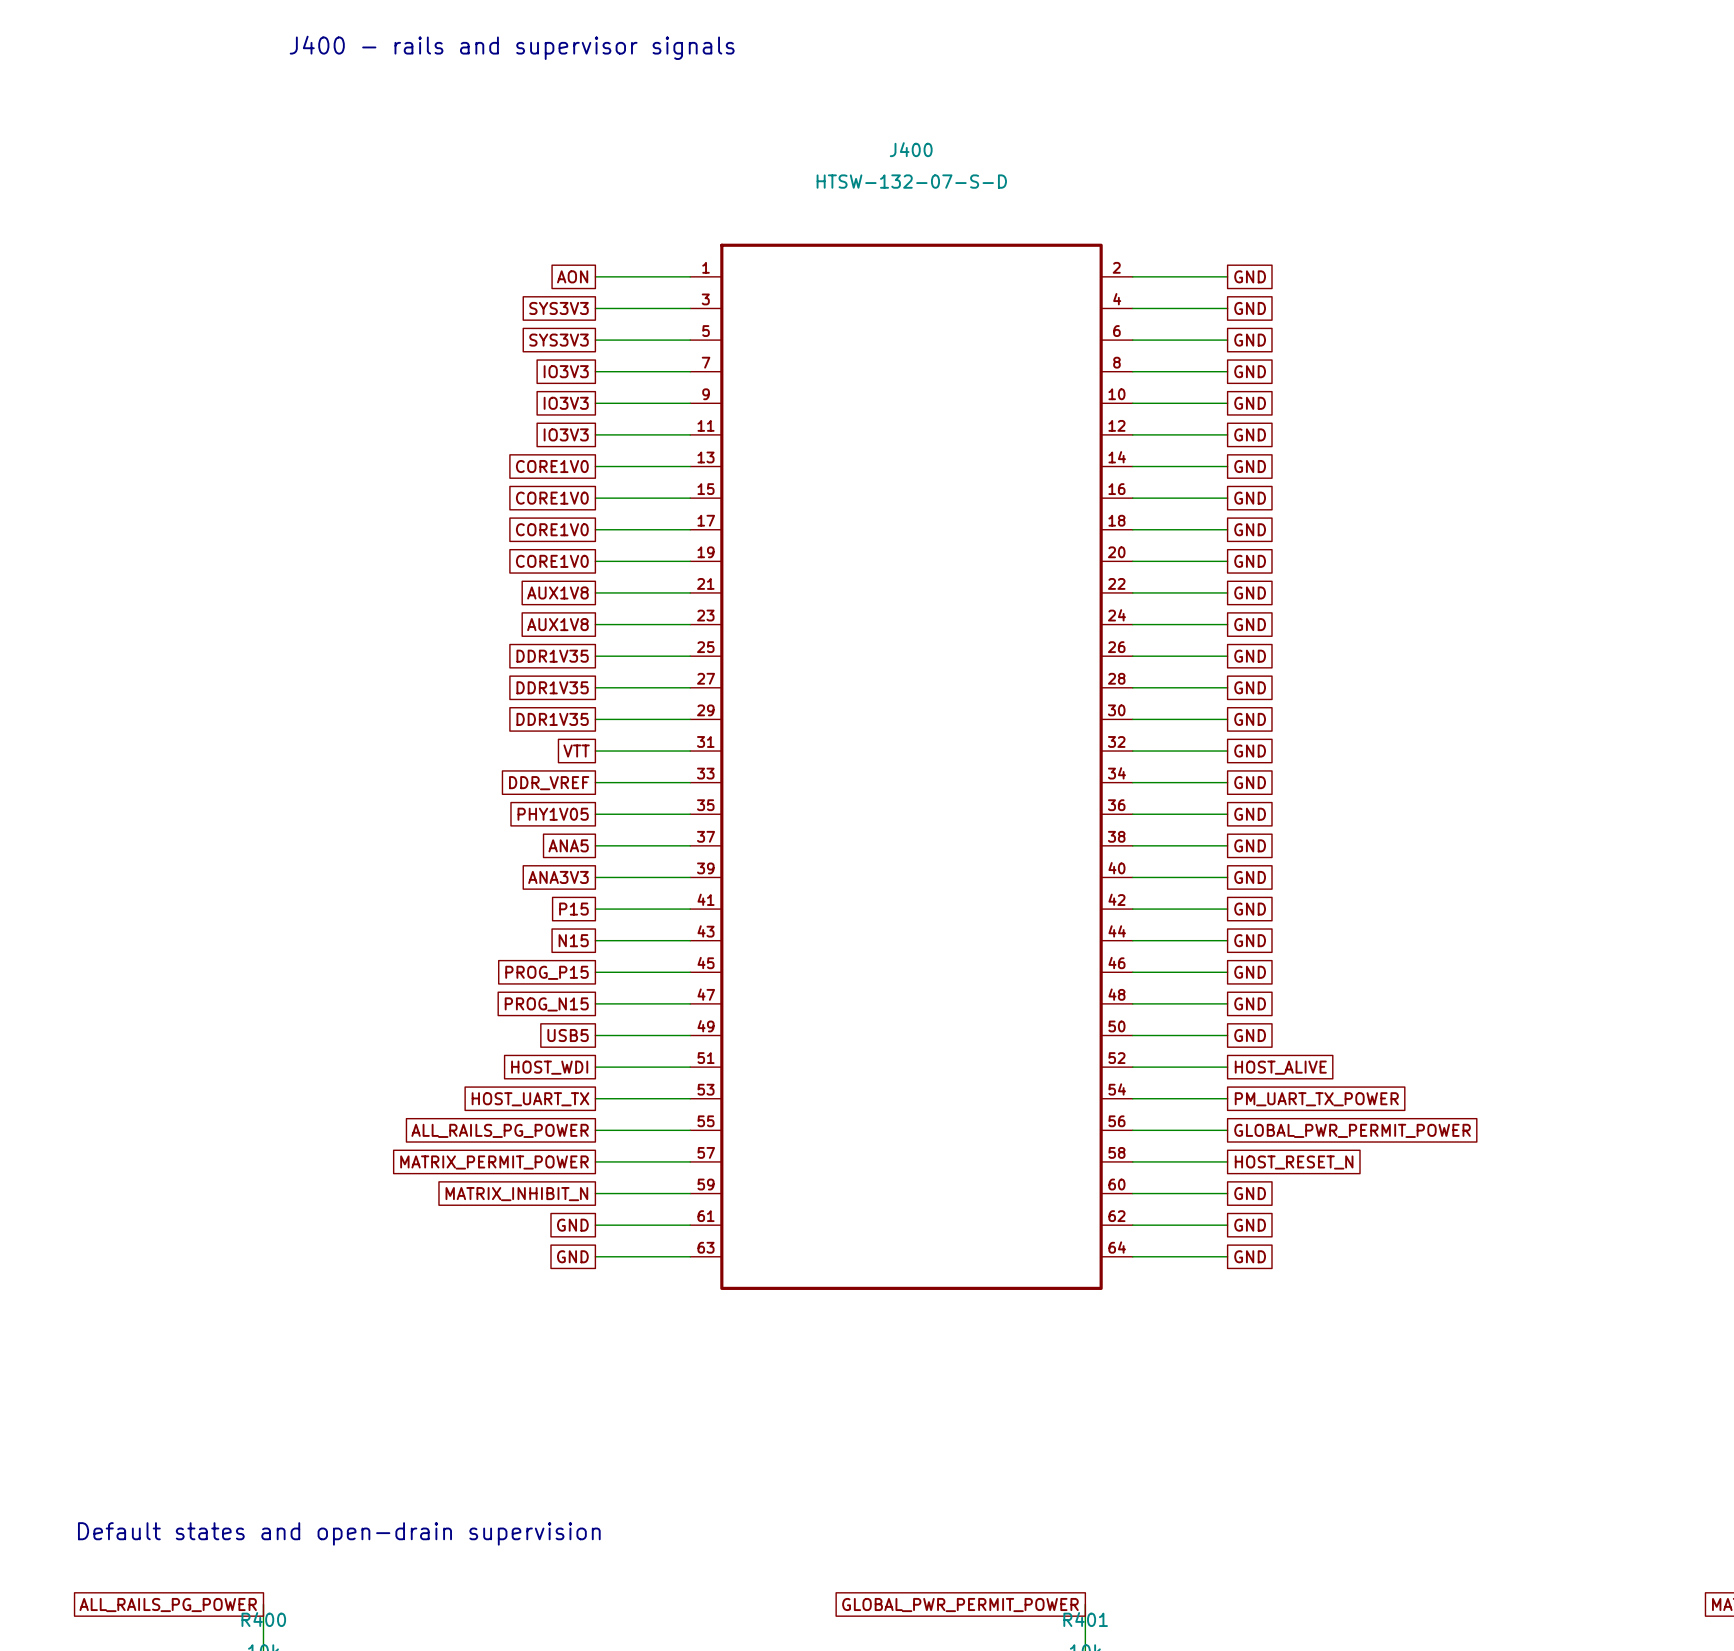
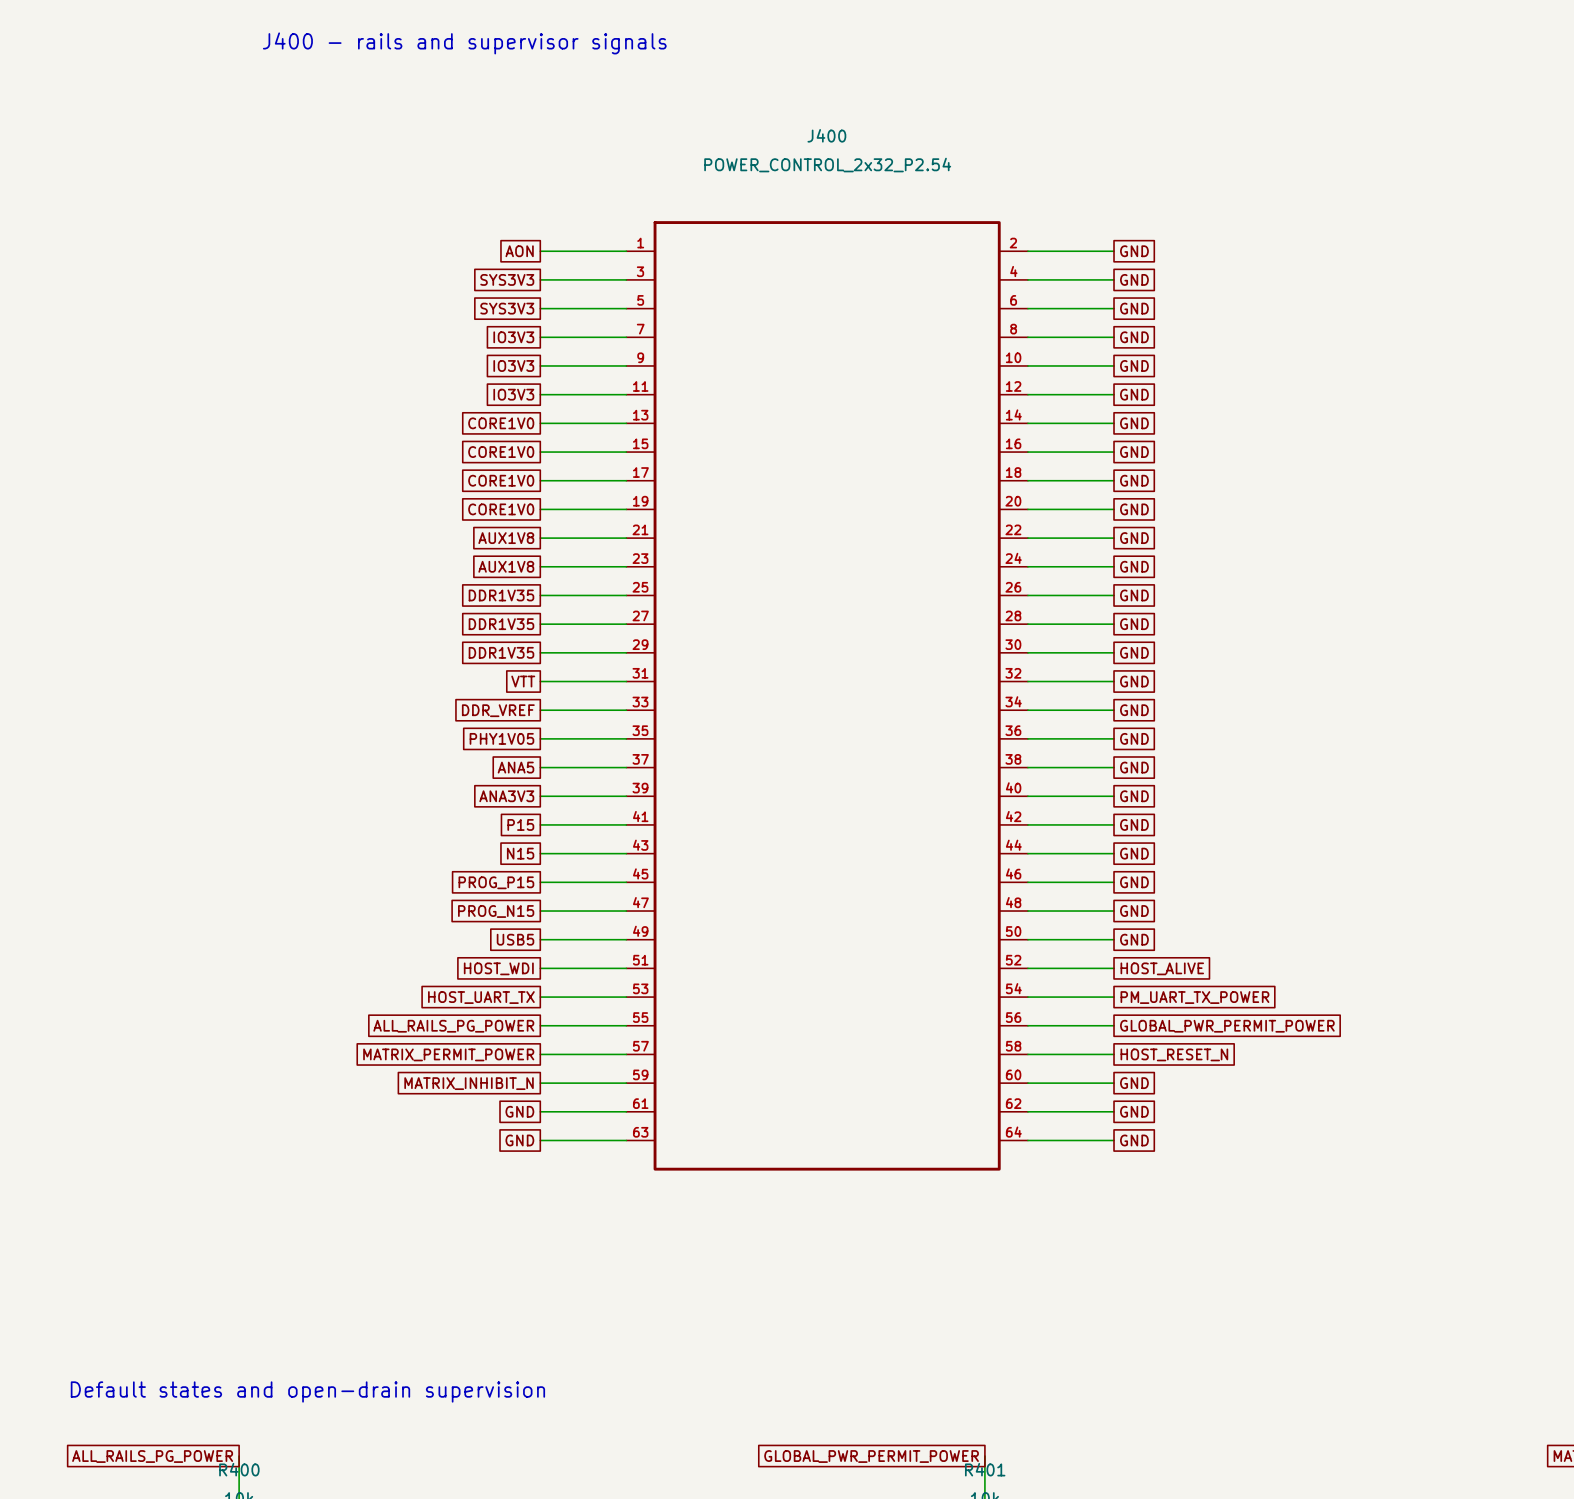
J400 value: HTSW-132-07-S-D (911, 181) -> POWER_CONTROL_2x32_P2.54 (827, 165)

